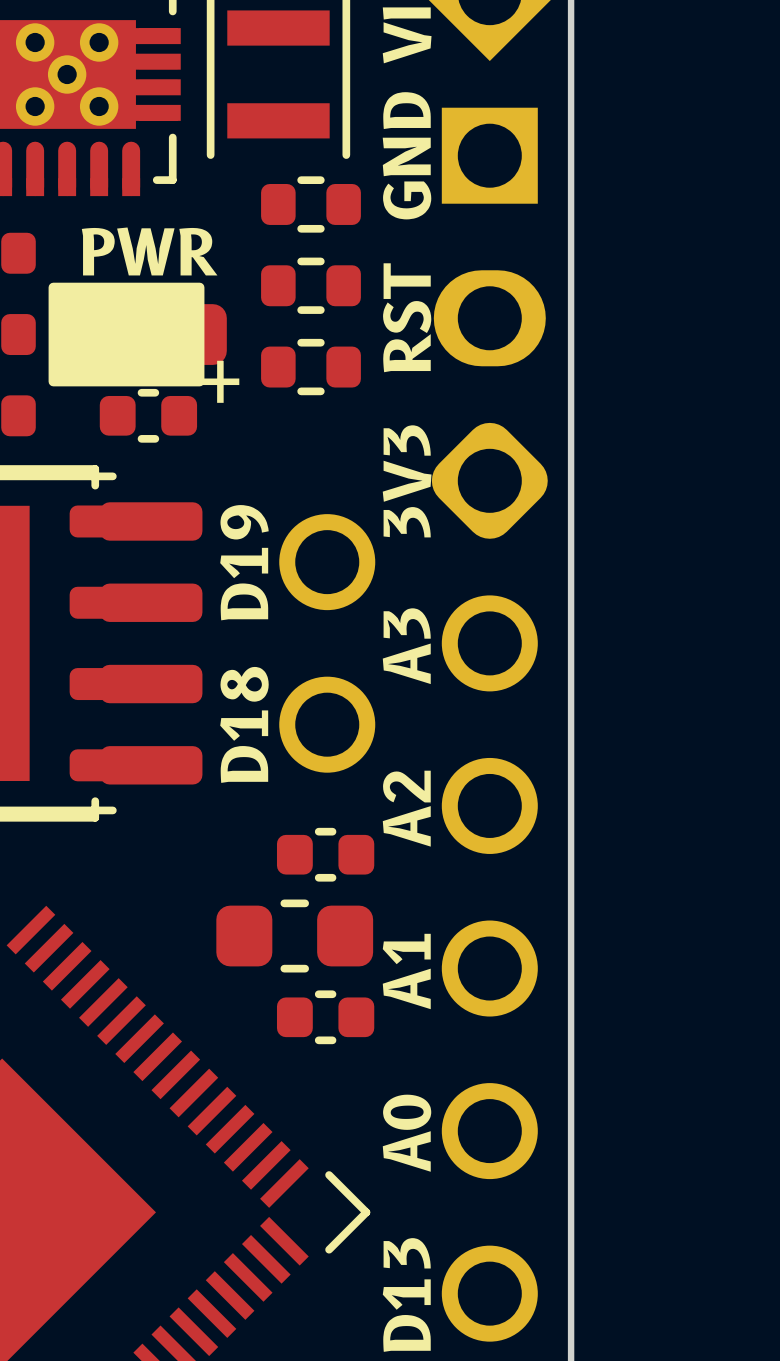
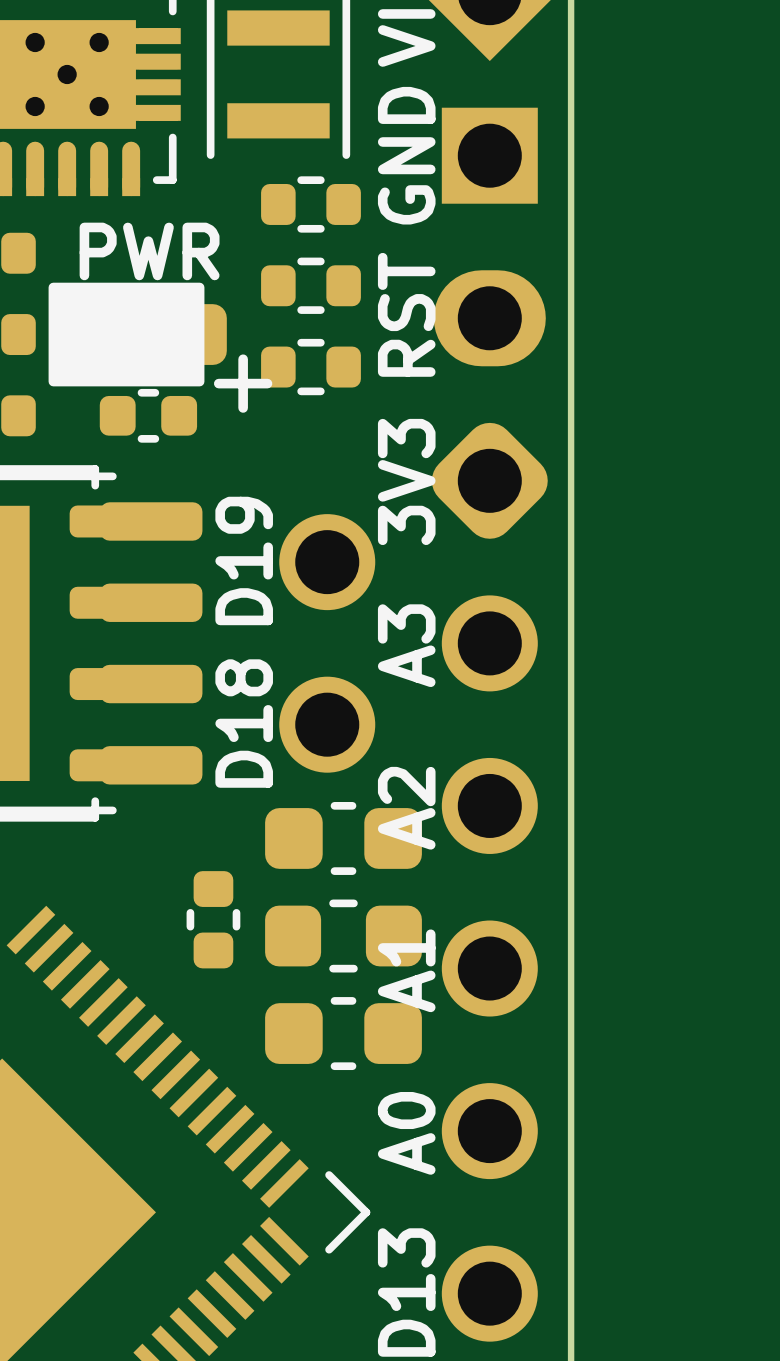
part footprint: [276, 827, 375, 882] -> [265, 801, 422, 875]
part: none -> (213, 919)
part position: (294, 936) -> (343, 936)
part footprint: [276, 990, 375, 1045] -> [265, 997, 422, 1071]

